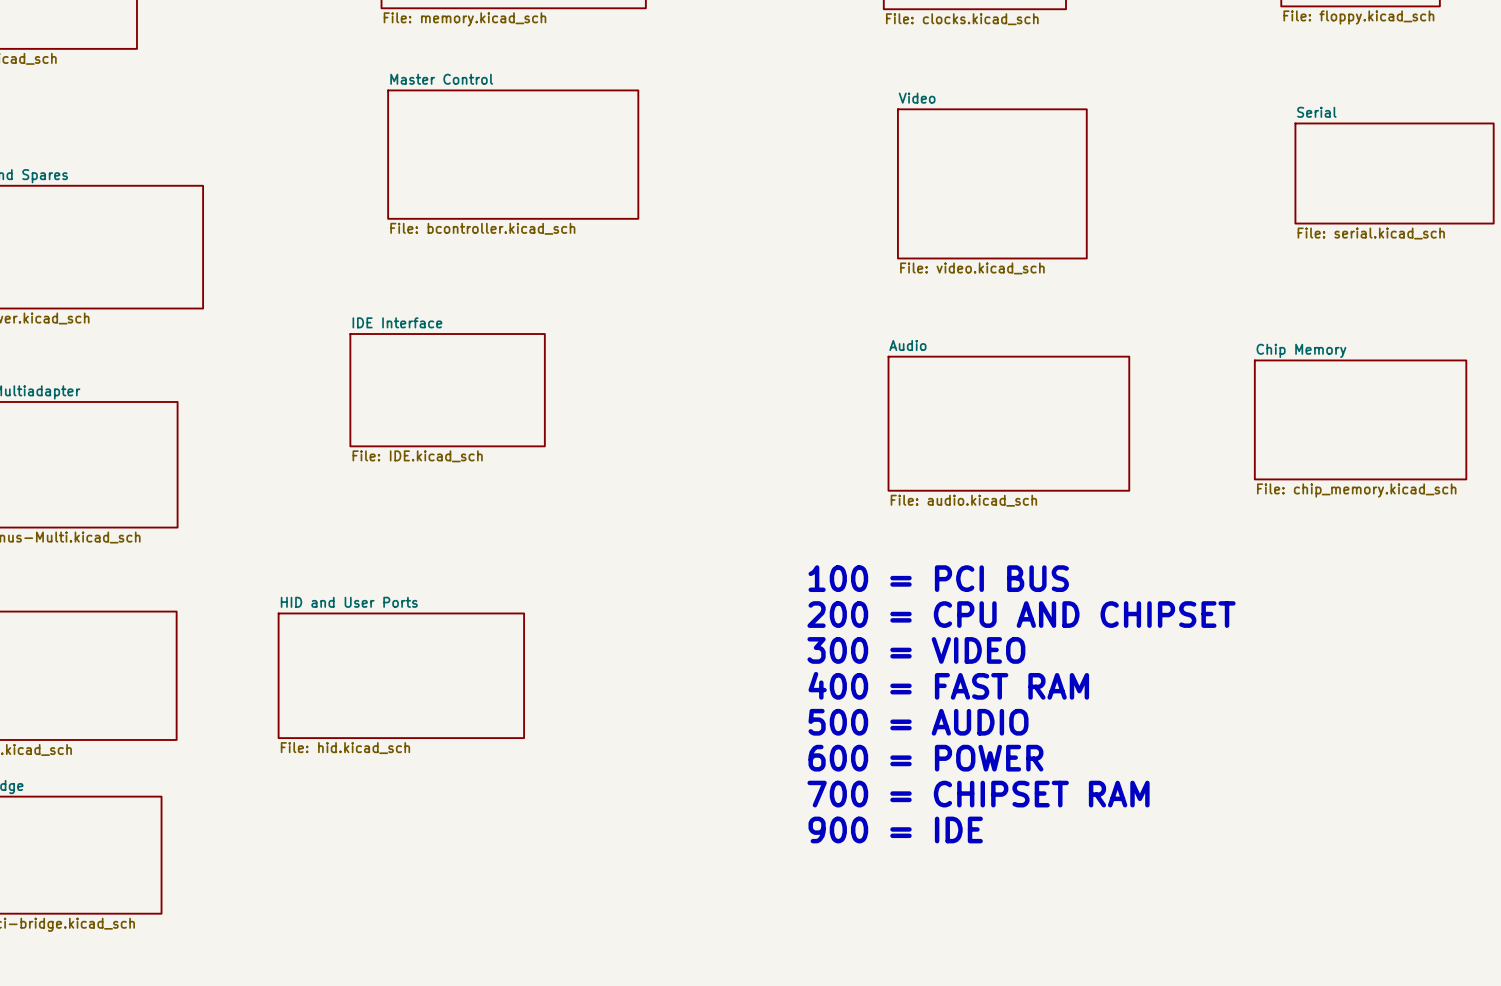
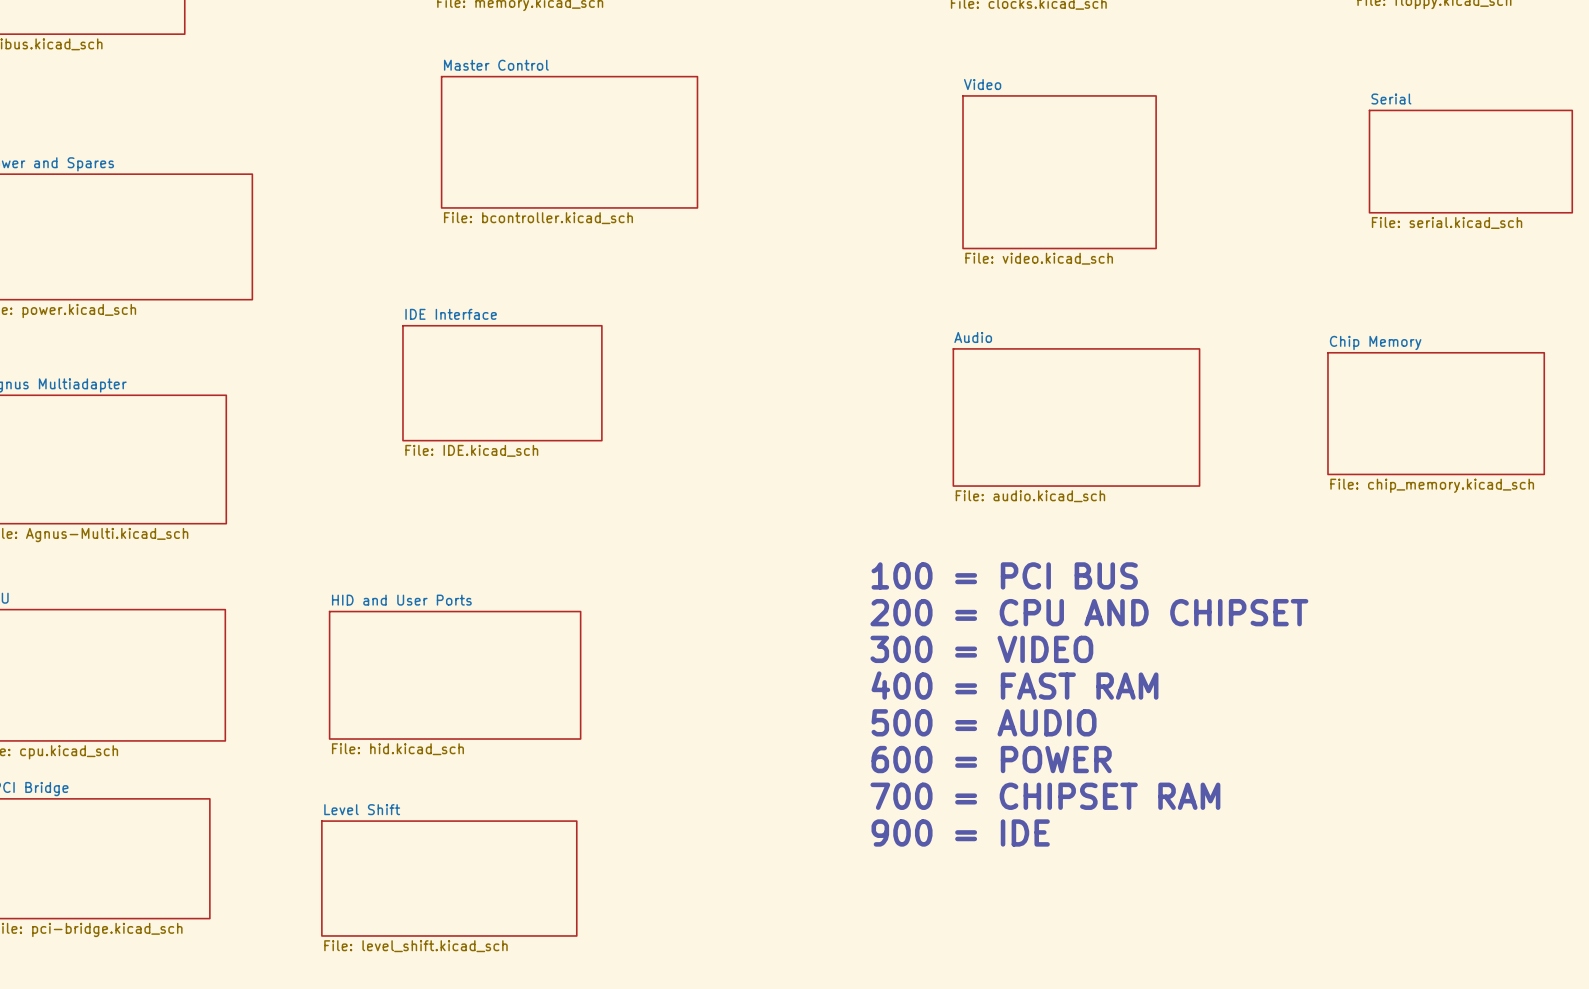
sheet Level Shift: none -> File: level_shift.kicad_sch (449, 878)

